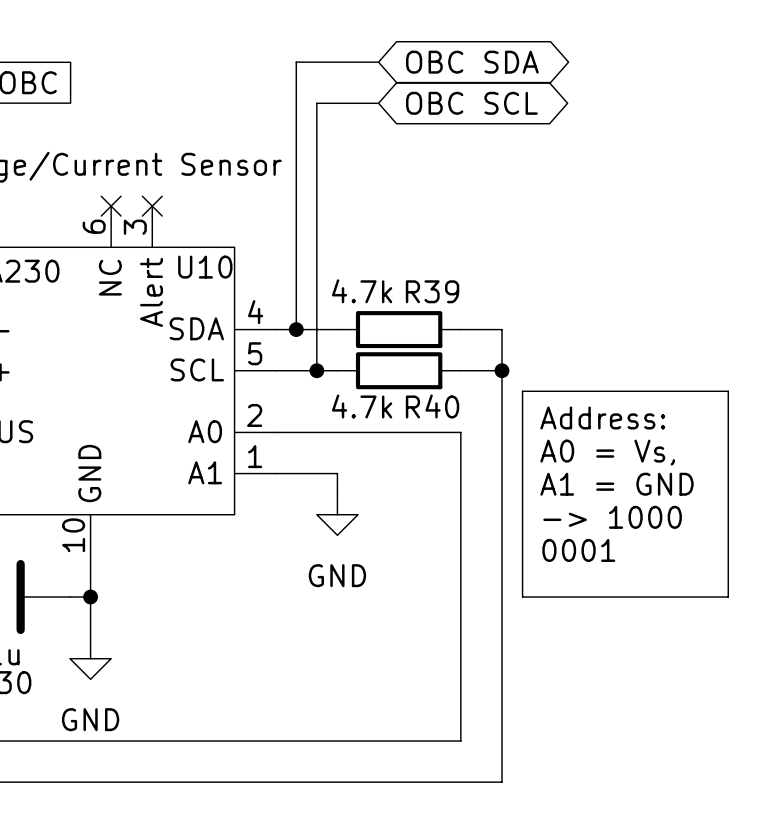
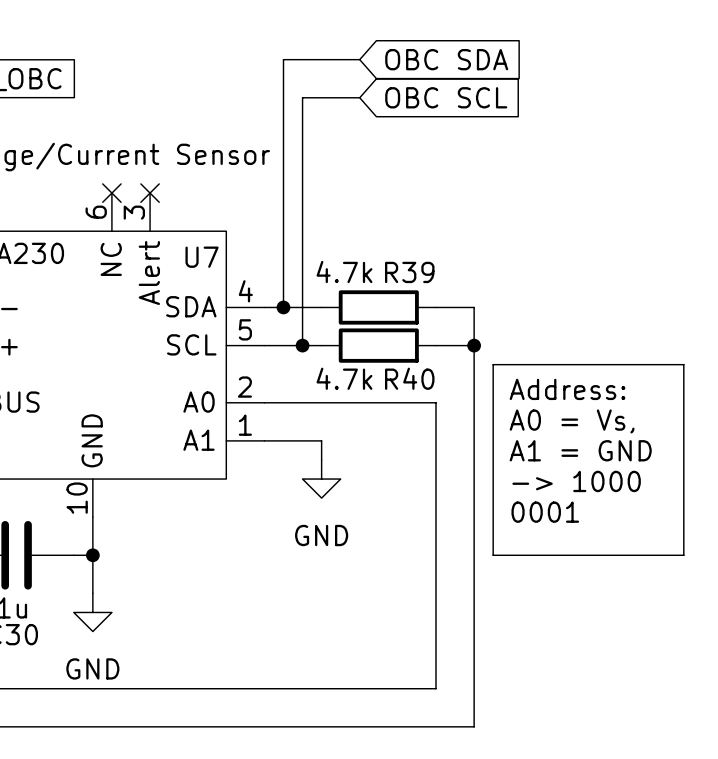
global label shape: bidirectional (472, 62) -> input (446, 59)
global label shape: bidirectional (471, 103) -> input (446, 97)
U10 name: U10 (205, 267) -> U7 (202, 257)

